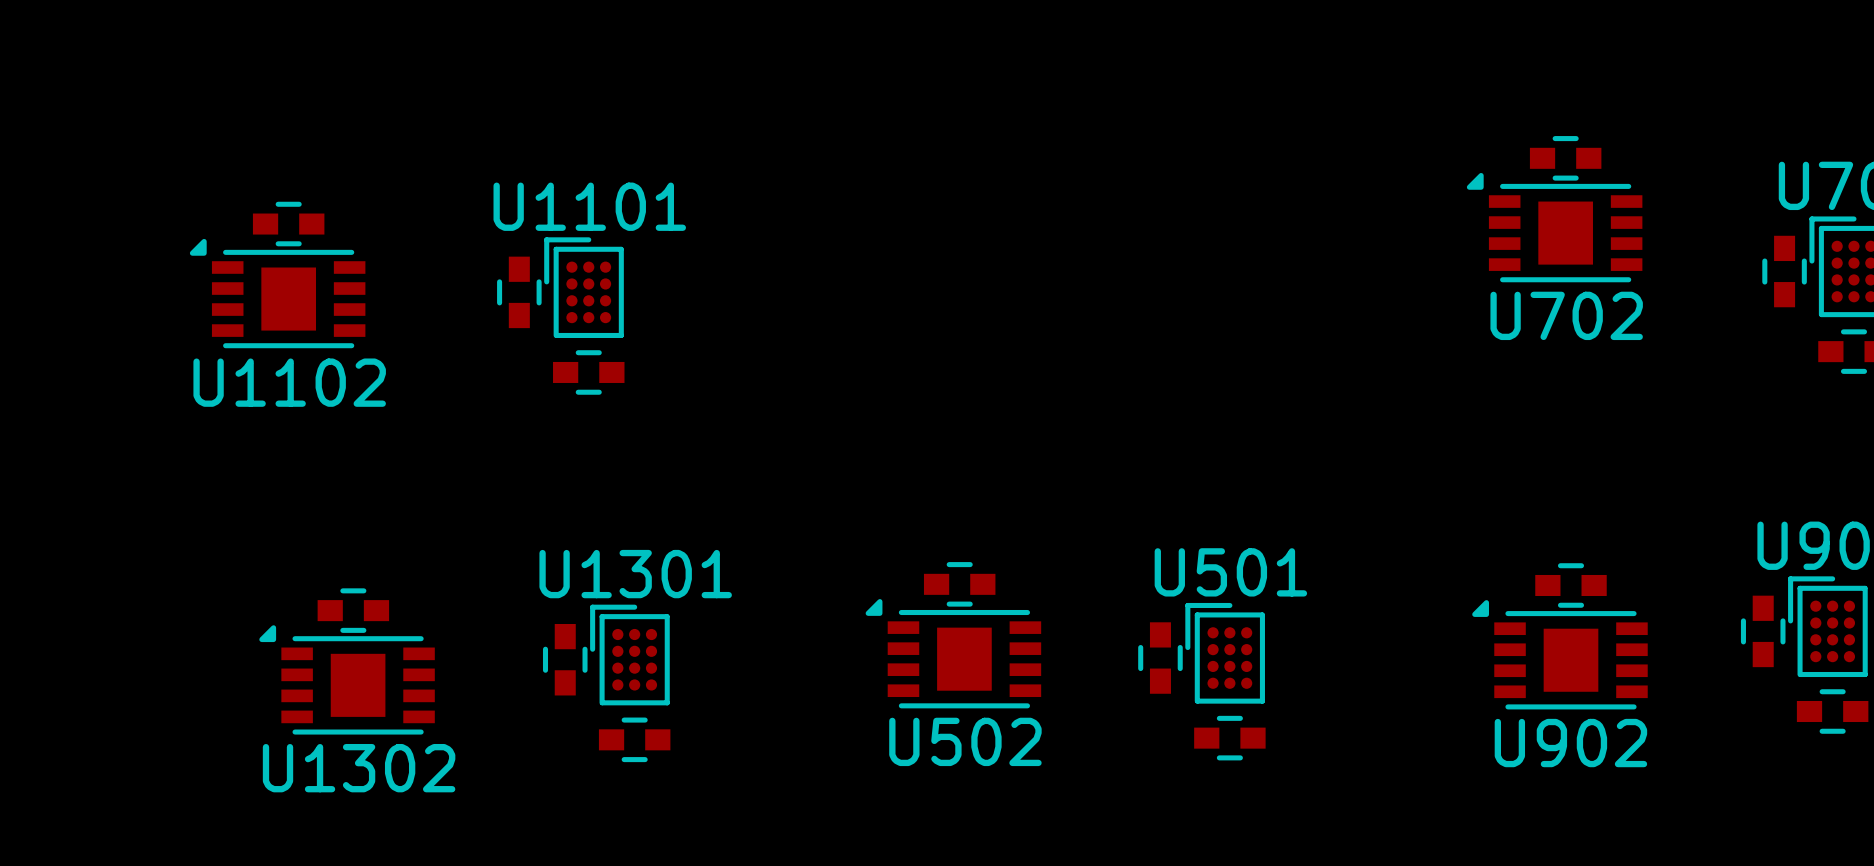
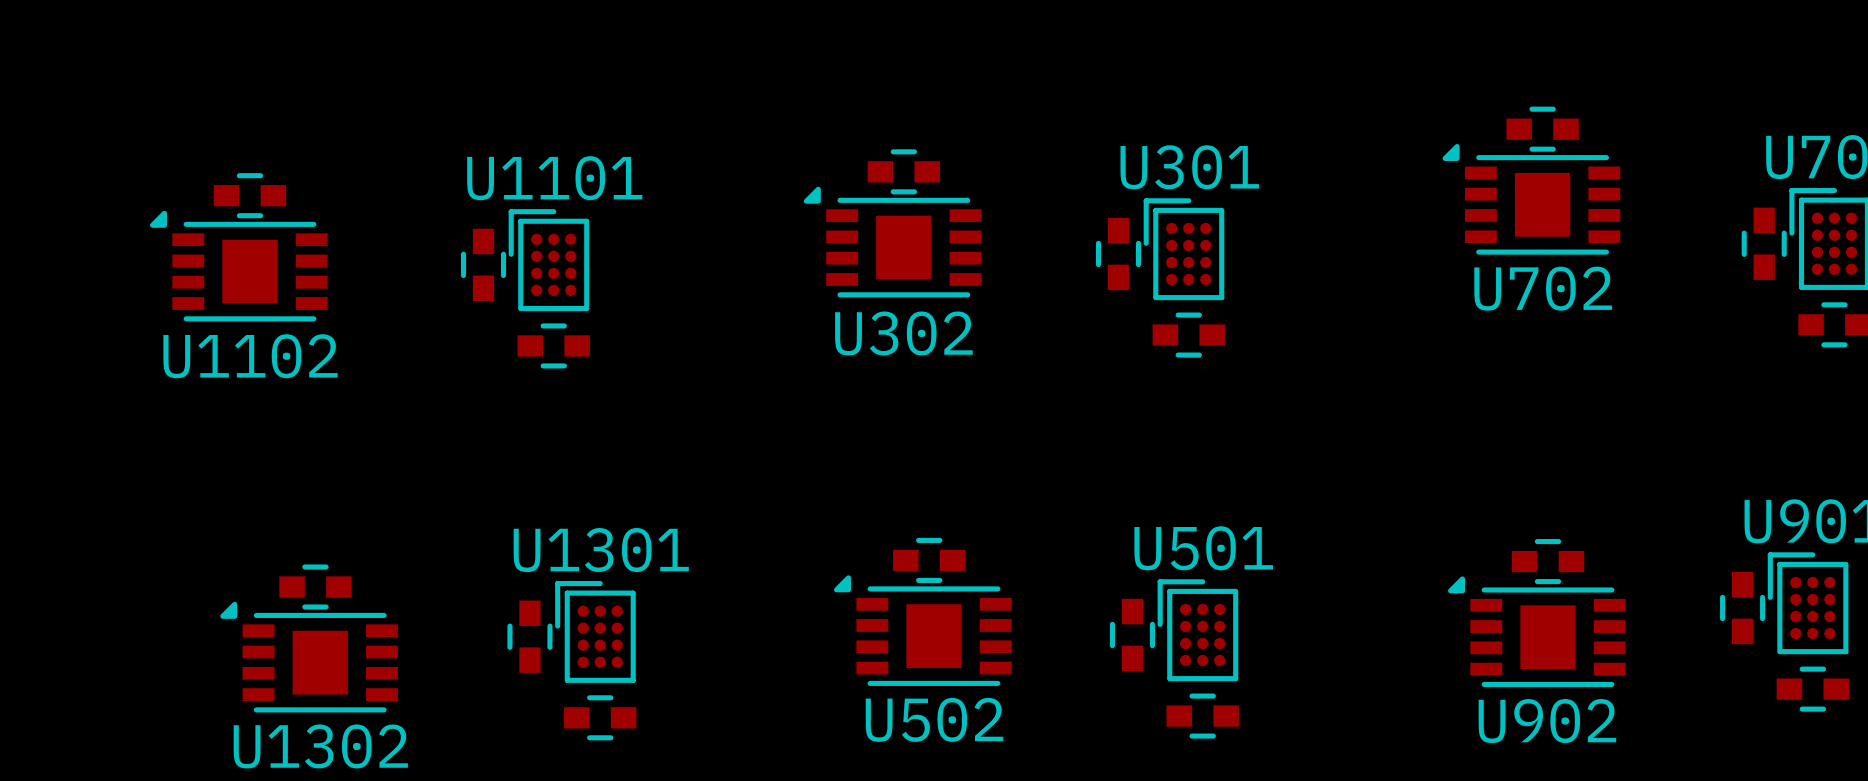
part: none -> (903, 171)
U302: none -> (892, 242)
U301: none -> (1183, 249)
part: none -> (1118, 253)
part: none -> (1188, 335)

